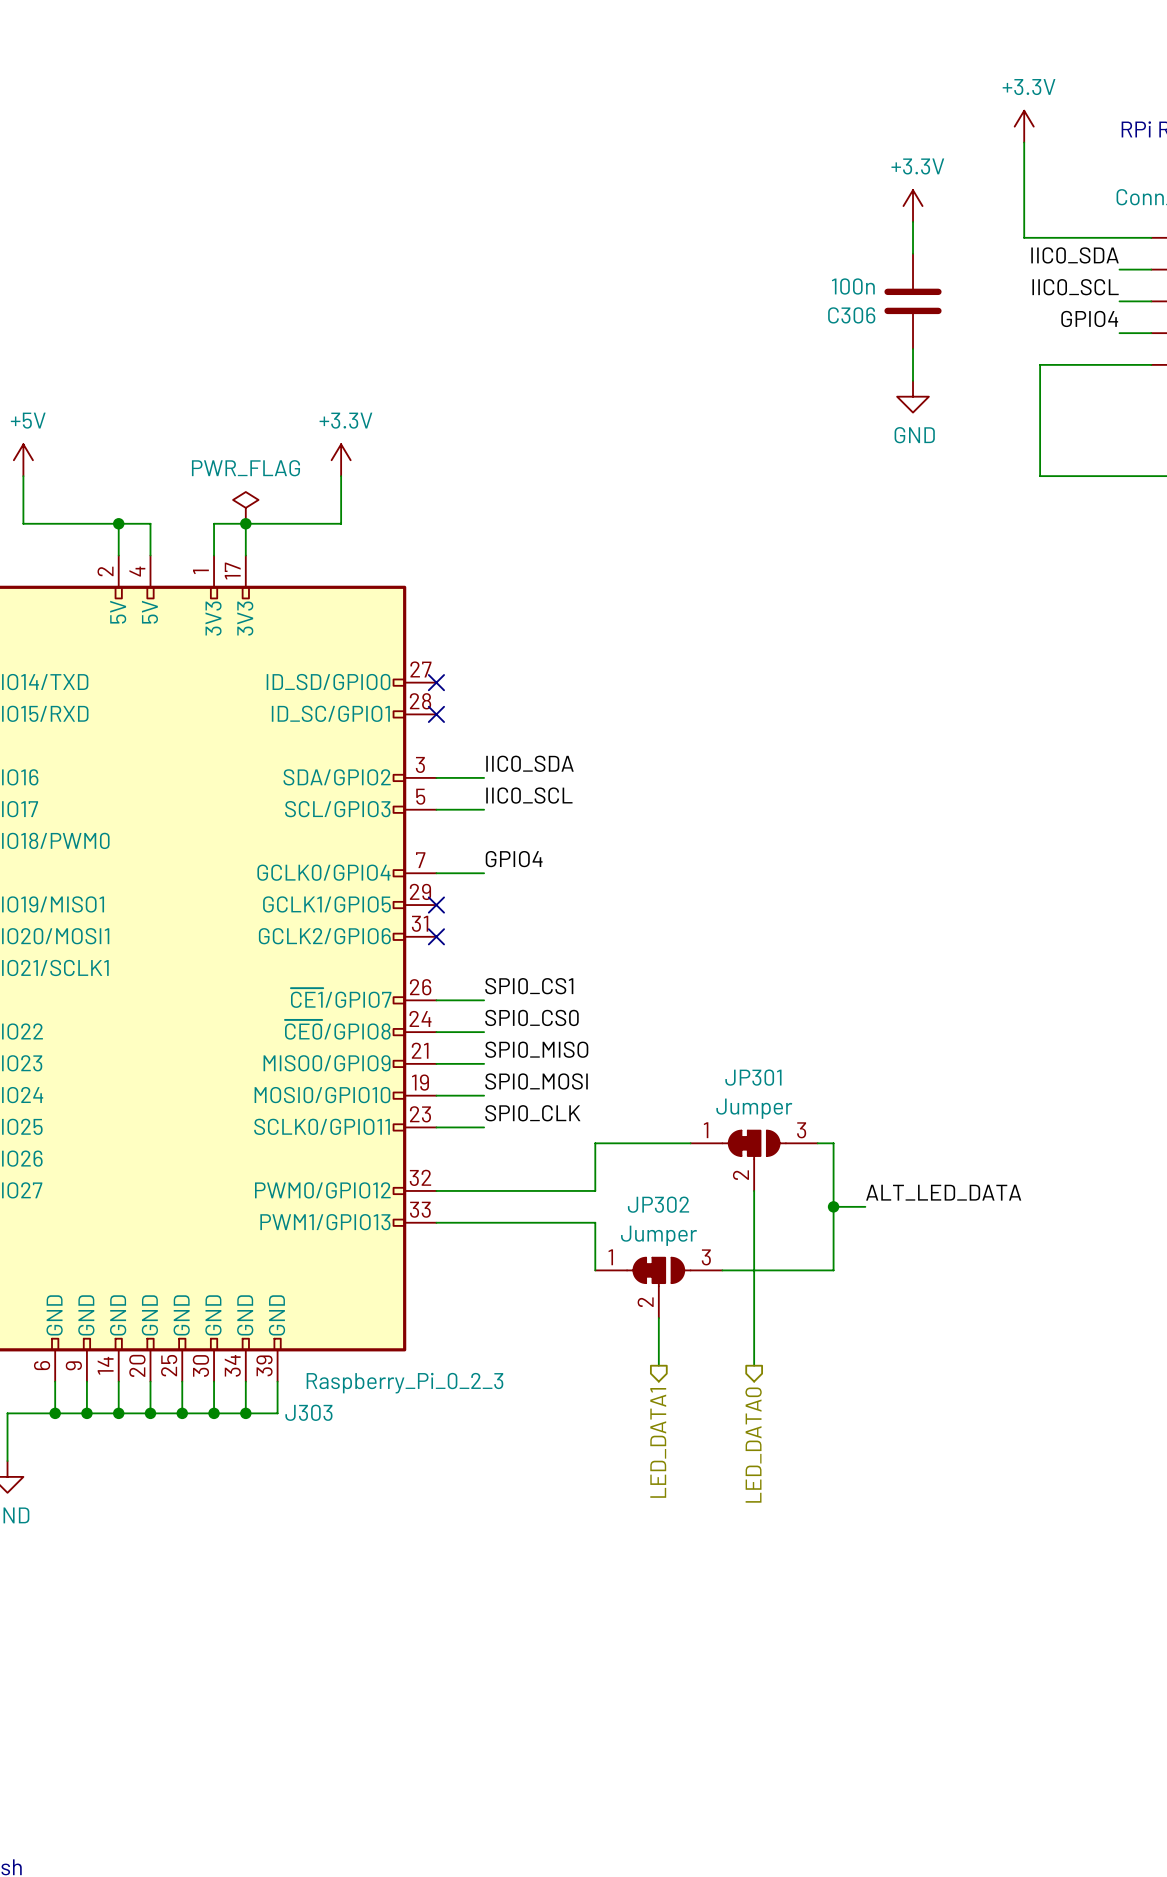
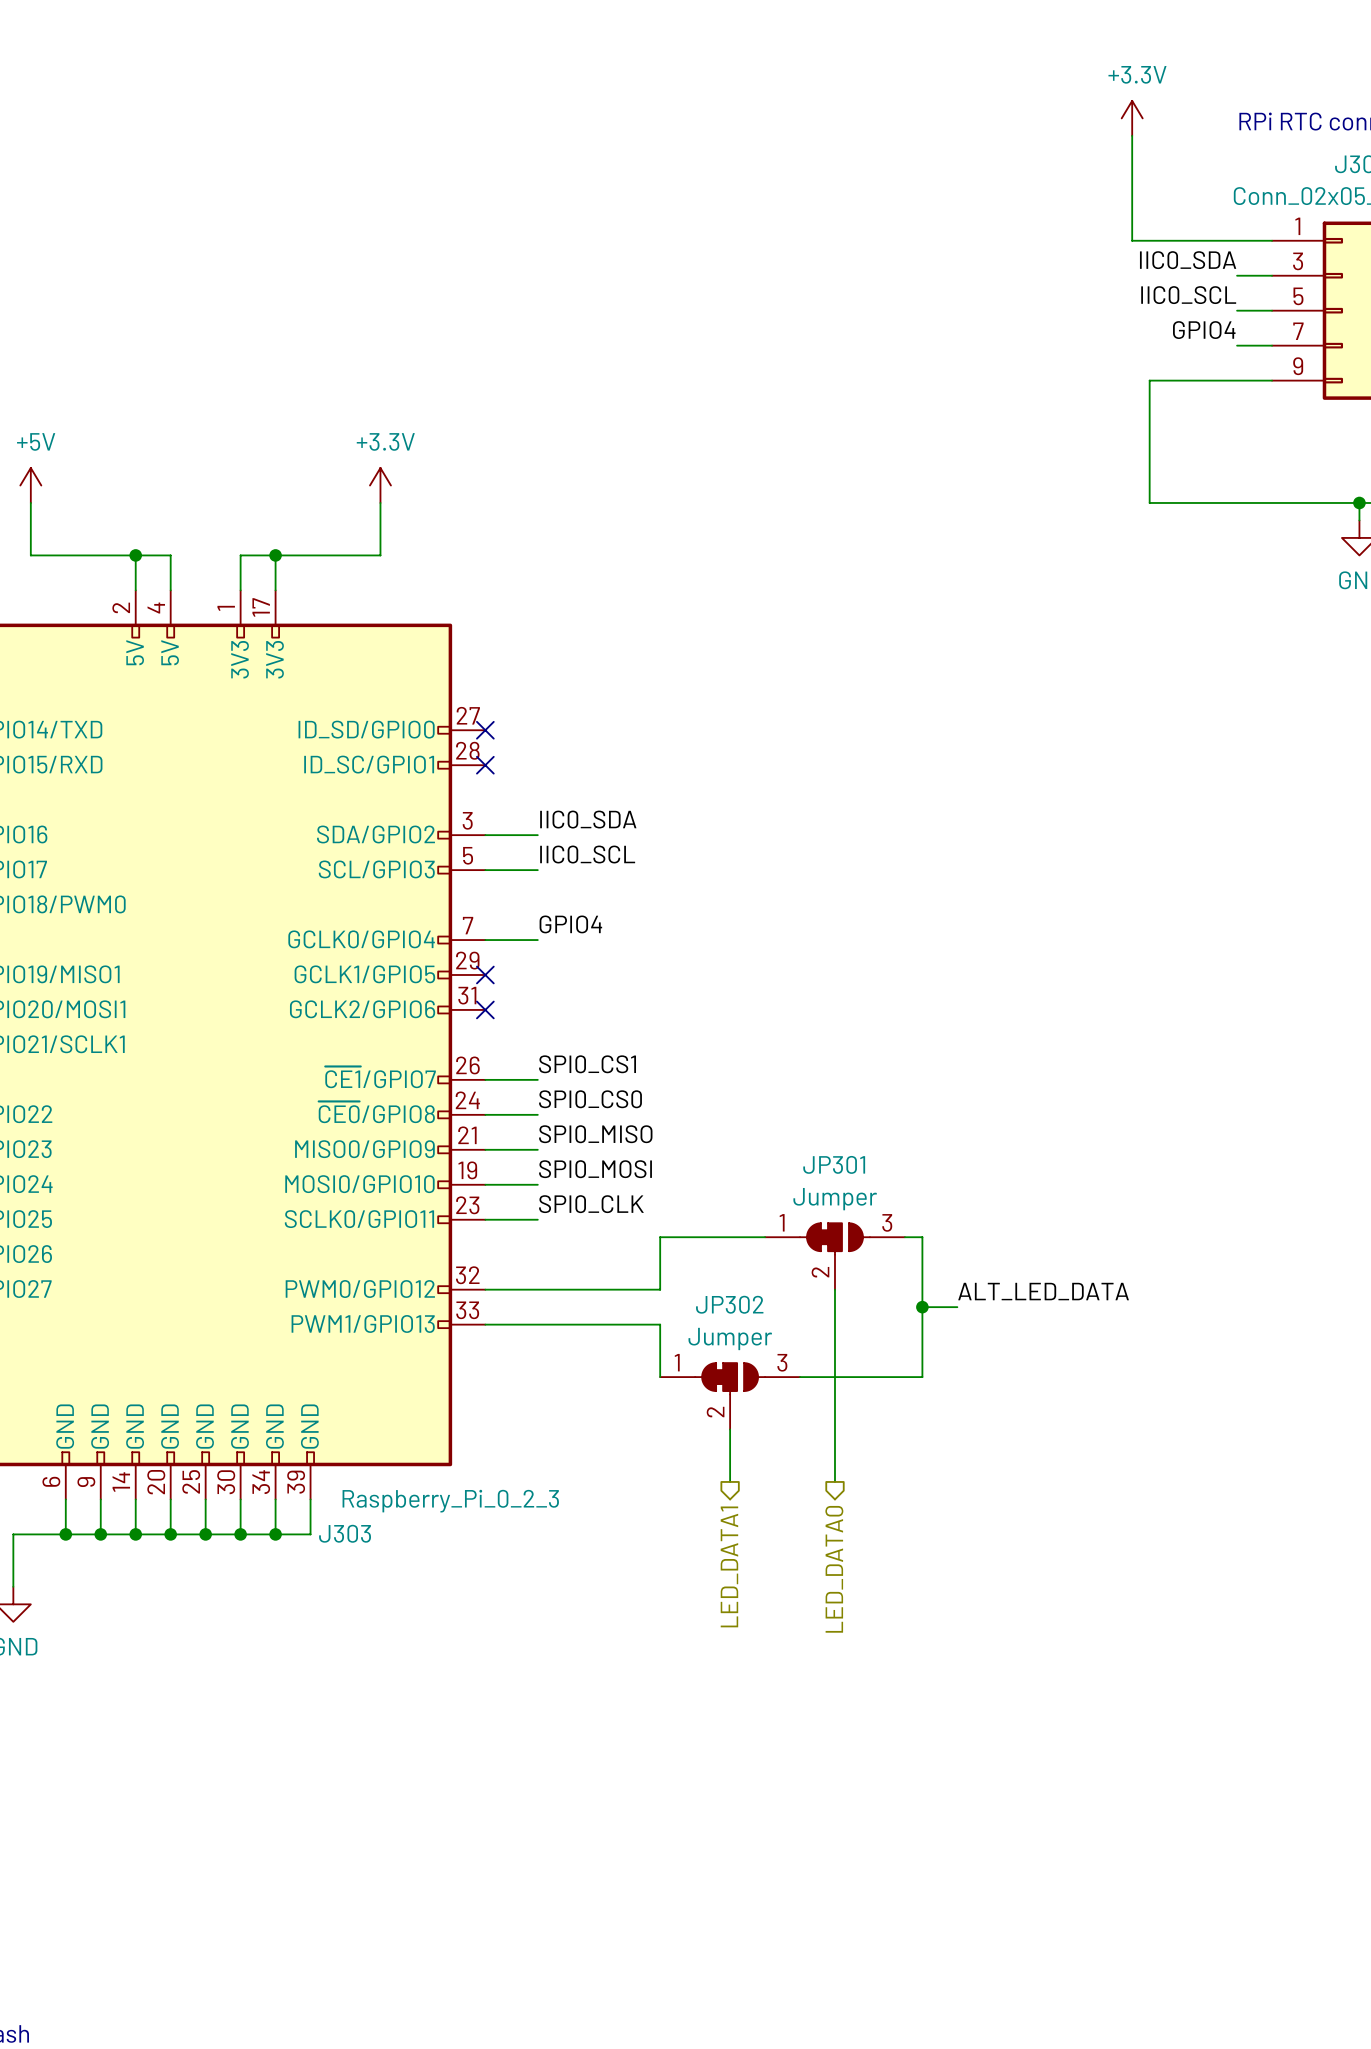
power symbol: +3.3V (913, 206) -> none
wire: (913, 221) (913, 253) -> none
C306: 100n (913, 301) -> none
wire: (913, 349) (913, 380) -> none
power symbol: GND (913, 396) -> none
power symbol: PWR_FLAG (245, 507) -> none

